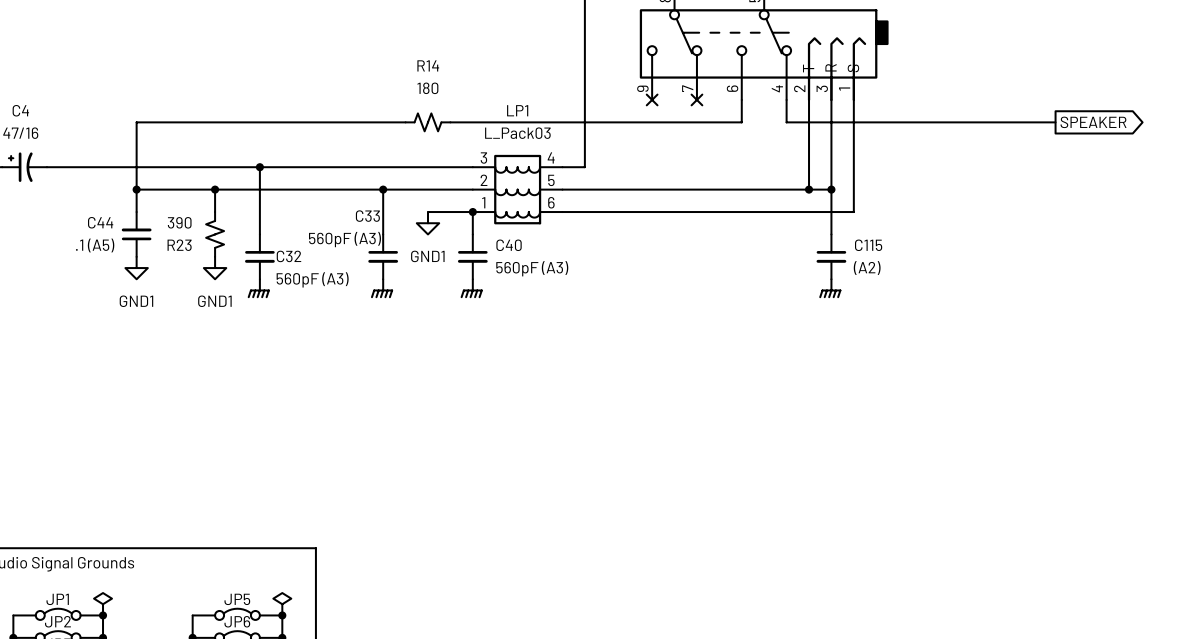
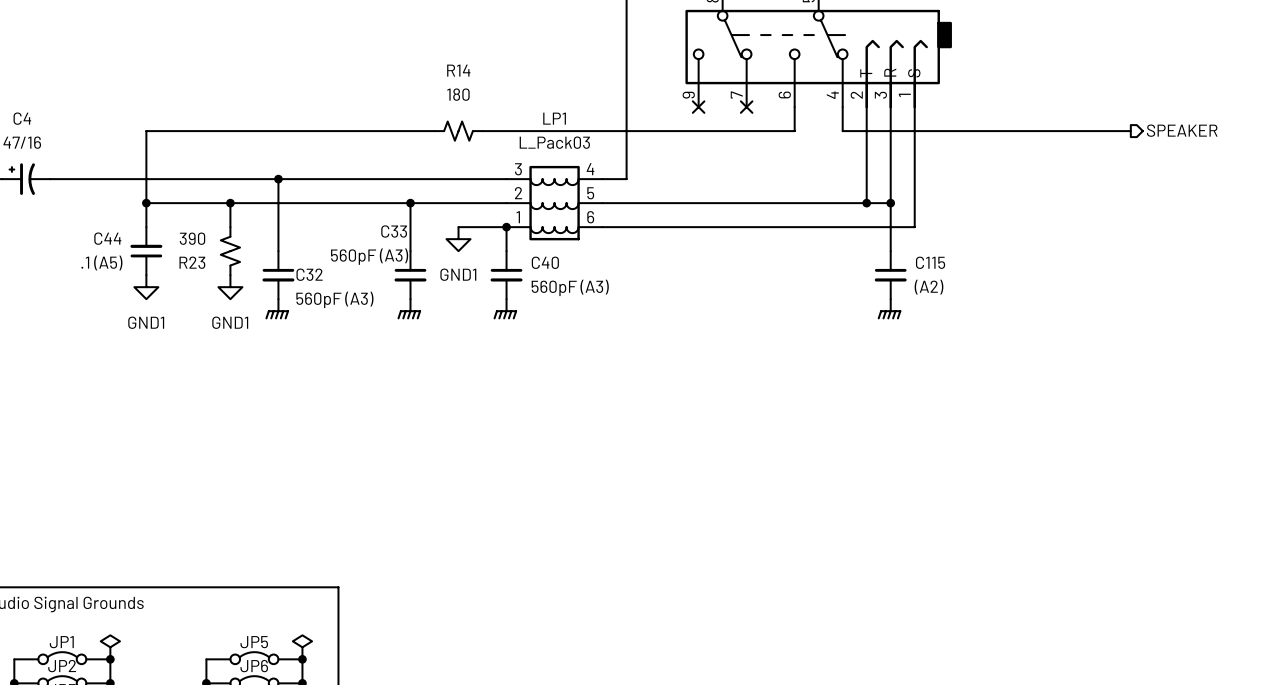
hierarchical label: none -> SPEAKER (1182, 130)
global label: SPEAKER (1093, 122) -> none

